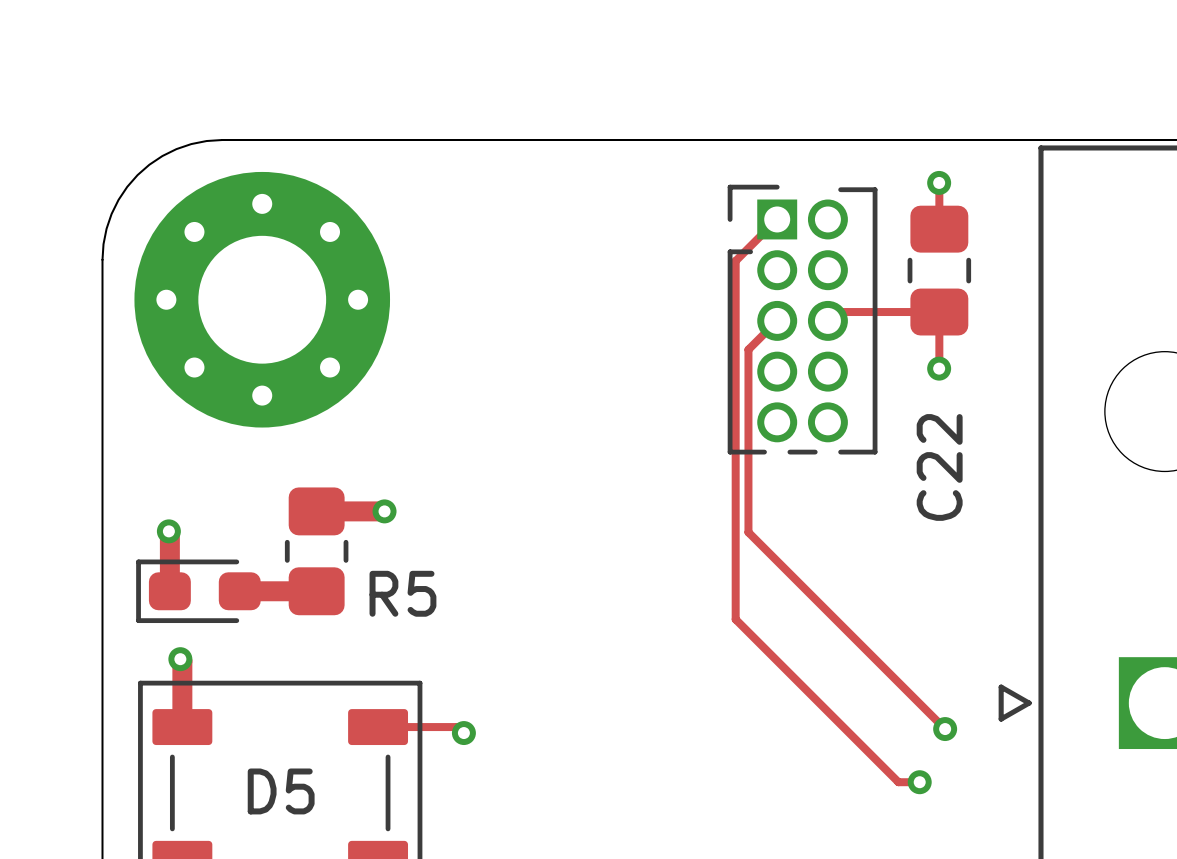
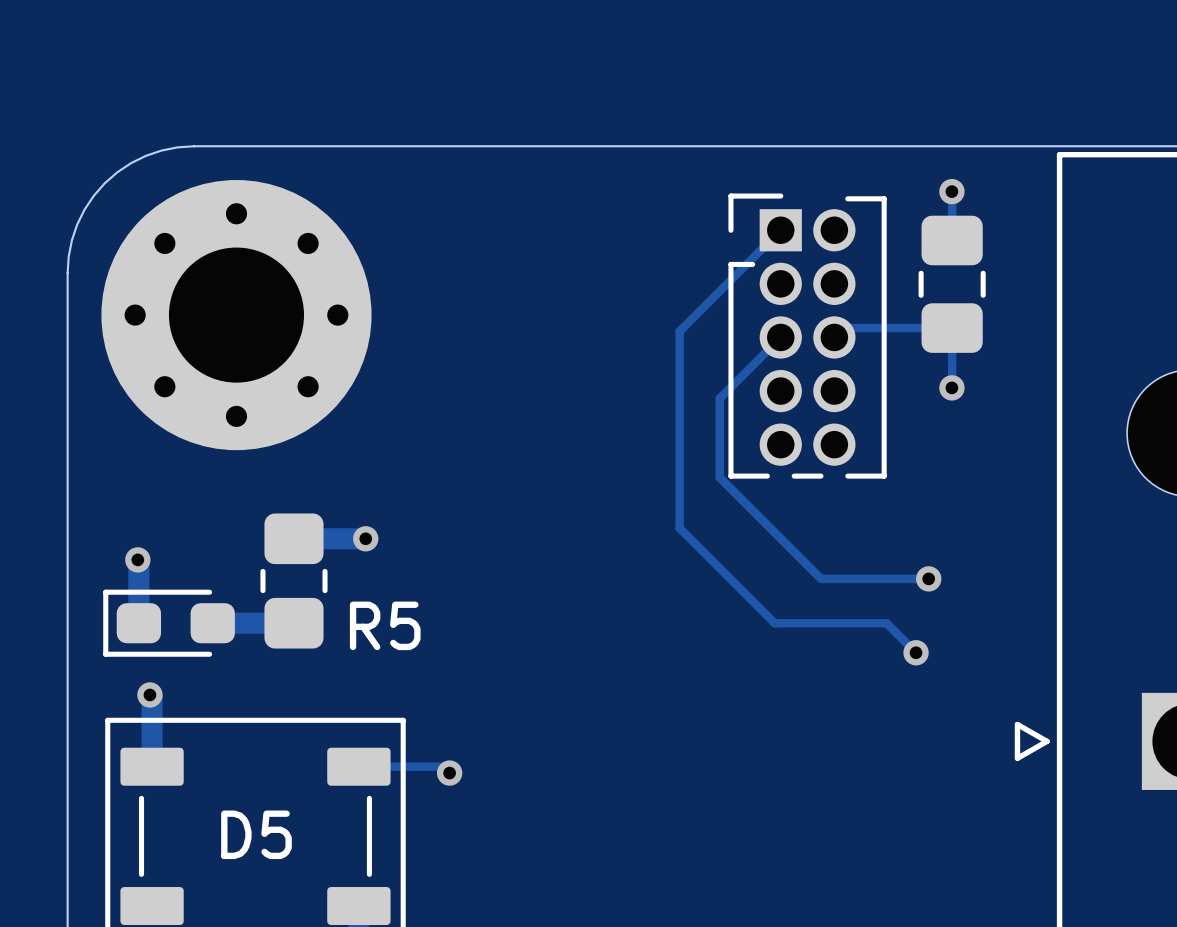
track: (735, 261) (735, 619) (898, 782) (919, 782) -> (736, 274) (679, 331) (679, 528) (774, 623) (886, 623) (916, 652)
track: (748, 349) (748, 532) (945, 729) -> (750, 367) (719, 398) (719, 477) (821, 578) (928, 578)
C22 name: C22 (939, 467) -> none
via: none -> (928, 578)
via: none -> (916, 652)
via: (945, 729) -> none
via: (919, 782) -> none

